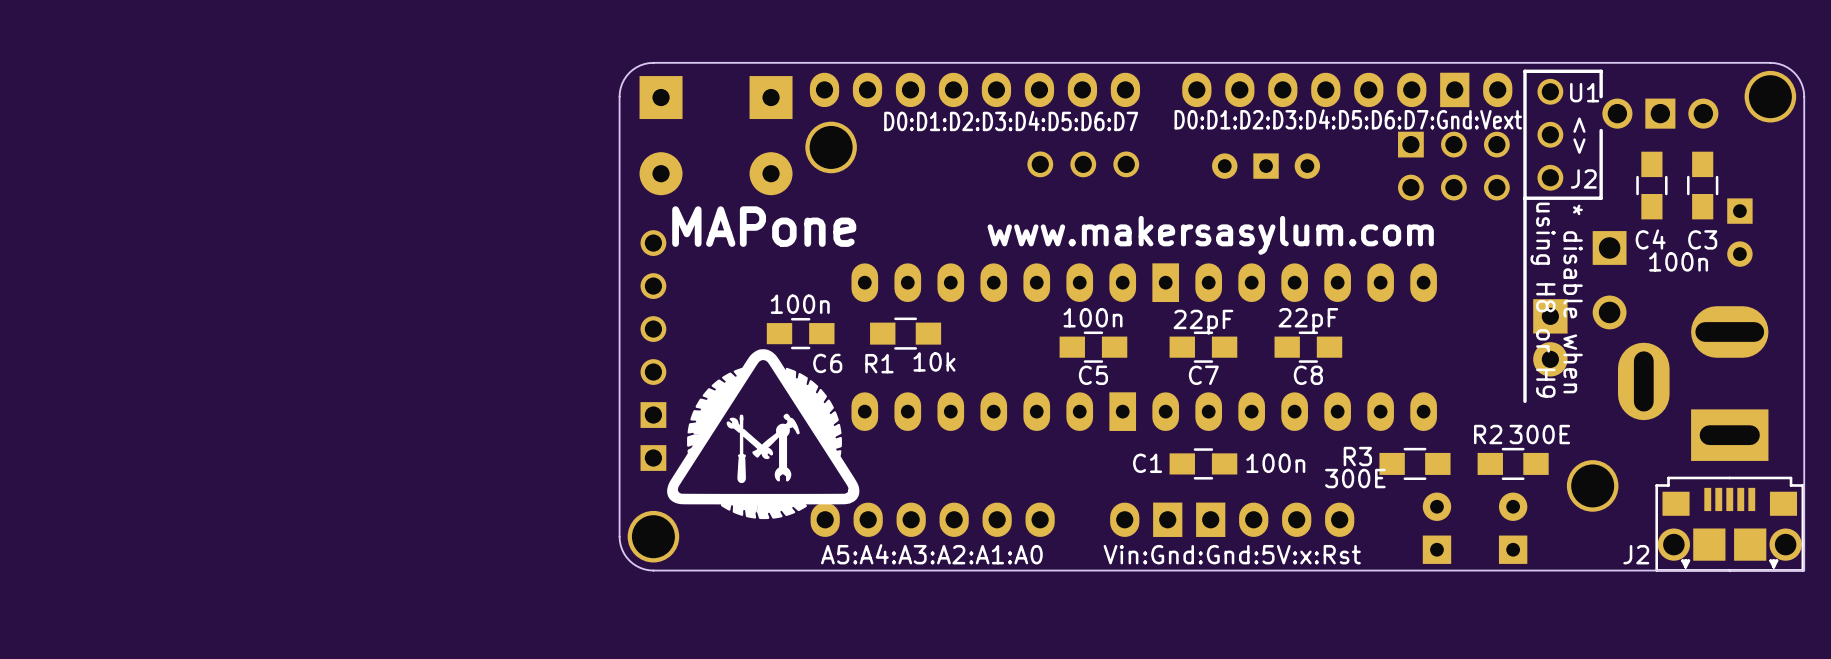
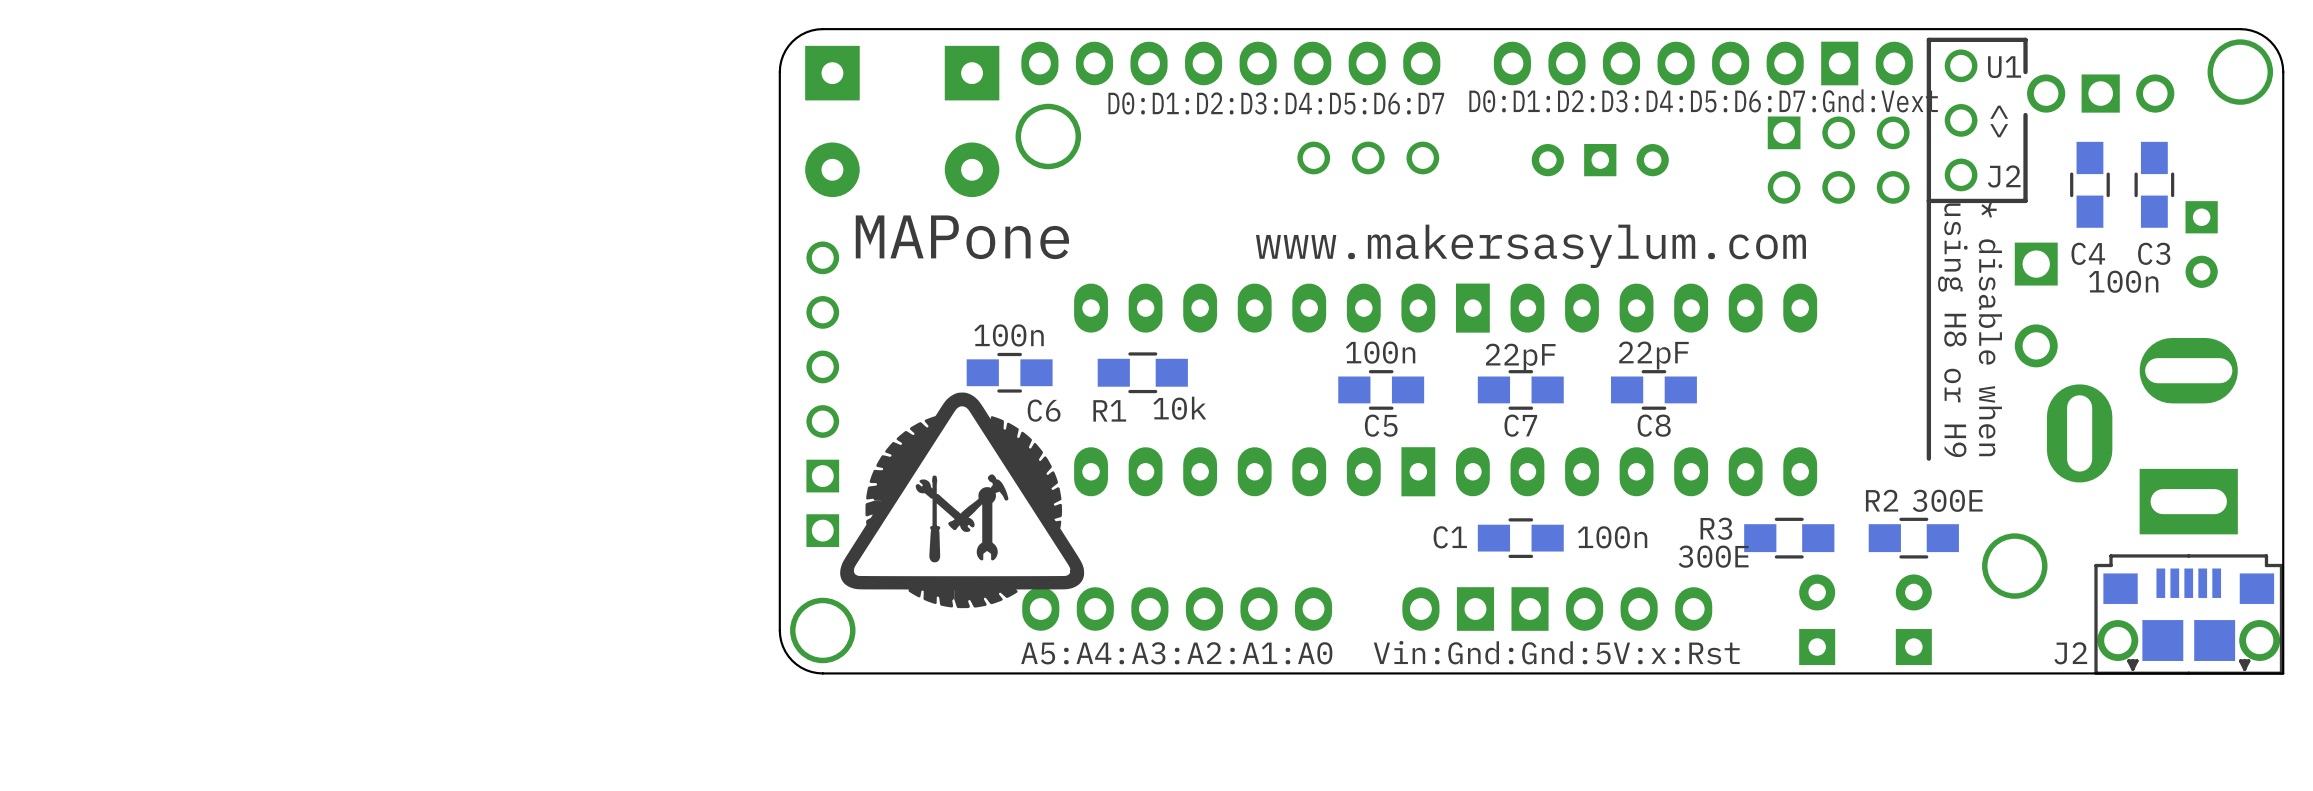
part: (1550, 337) -> none

